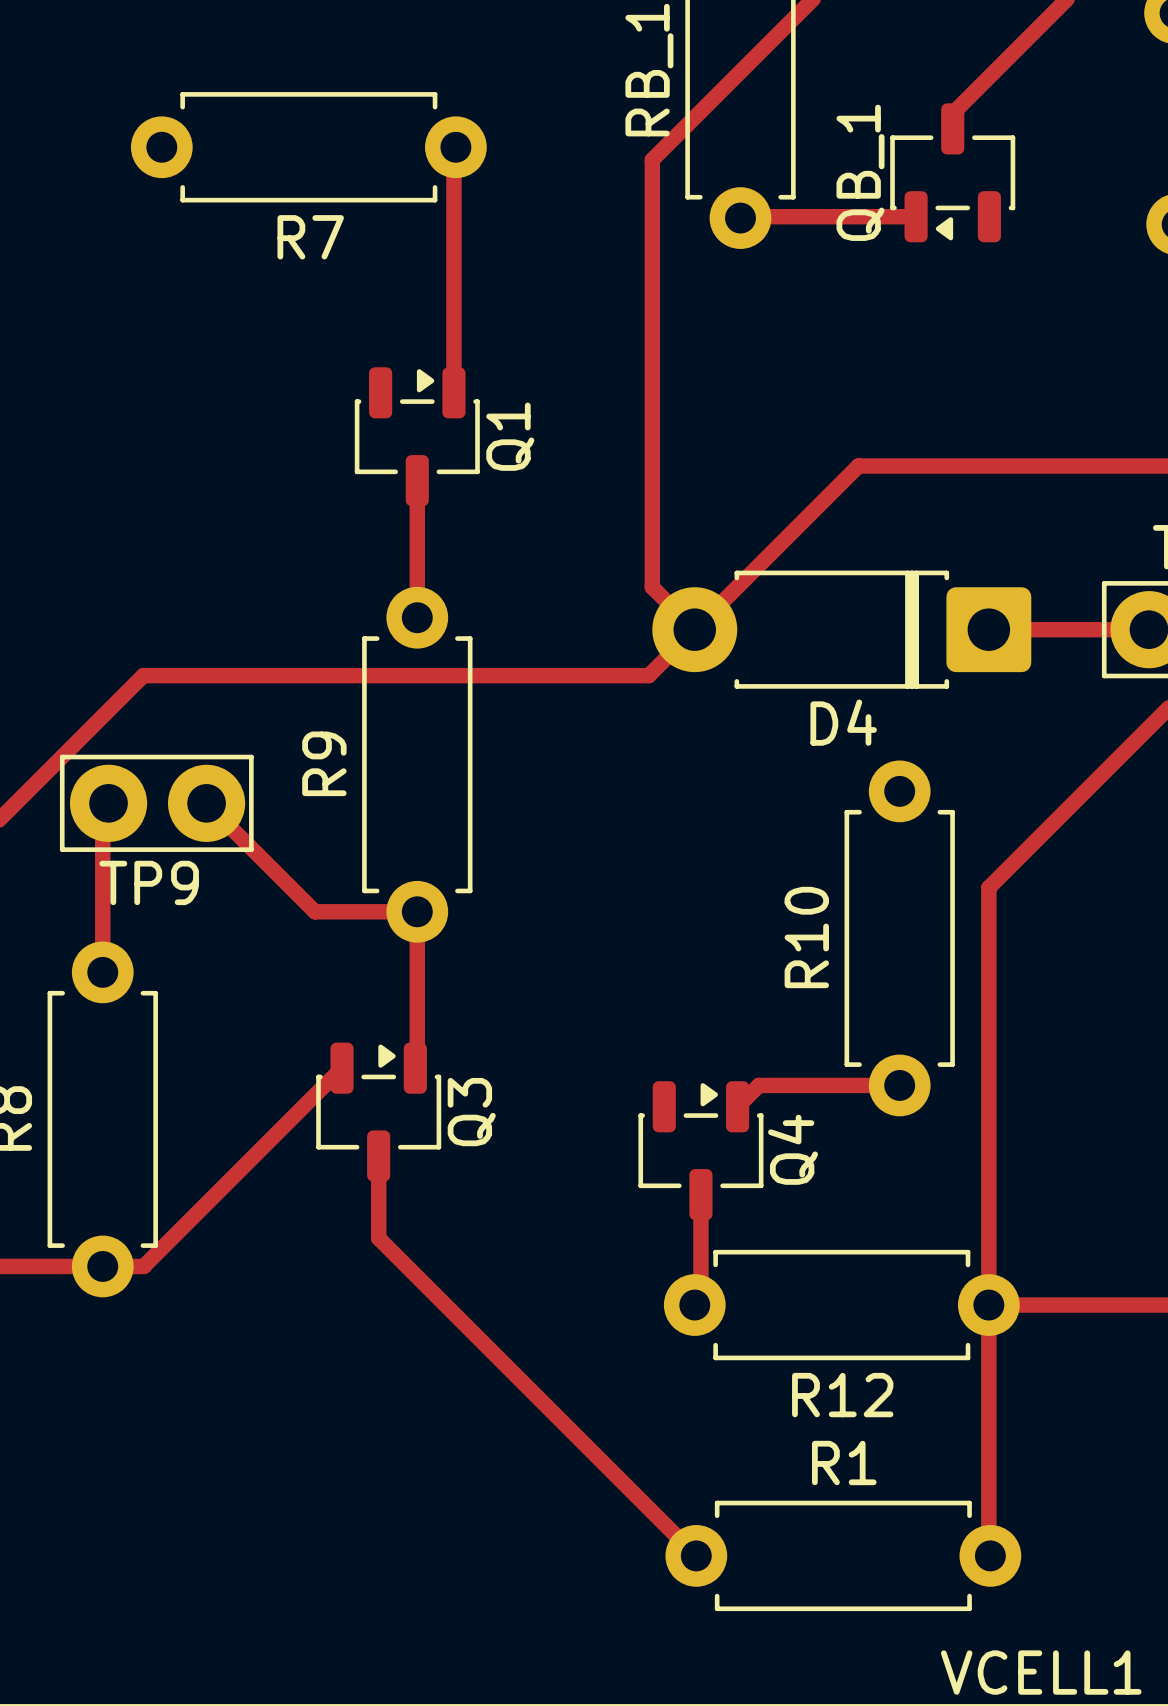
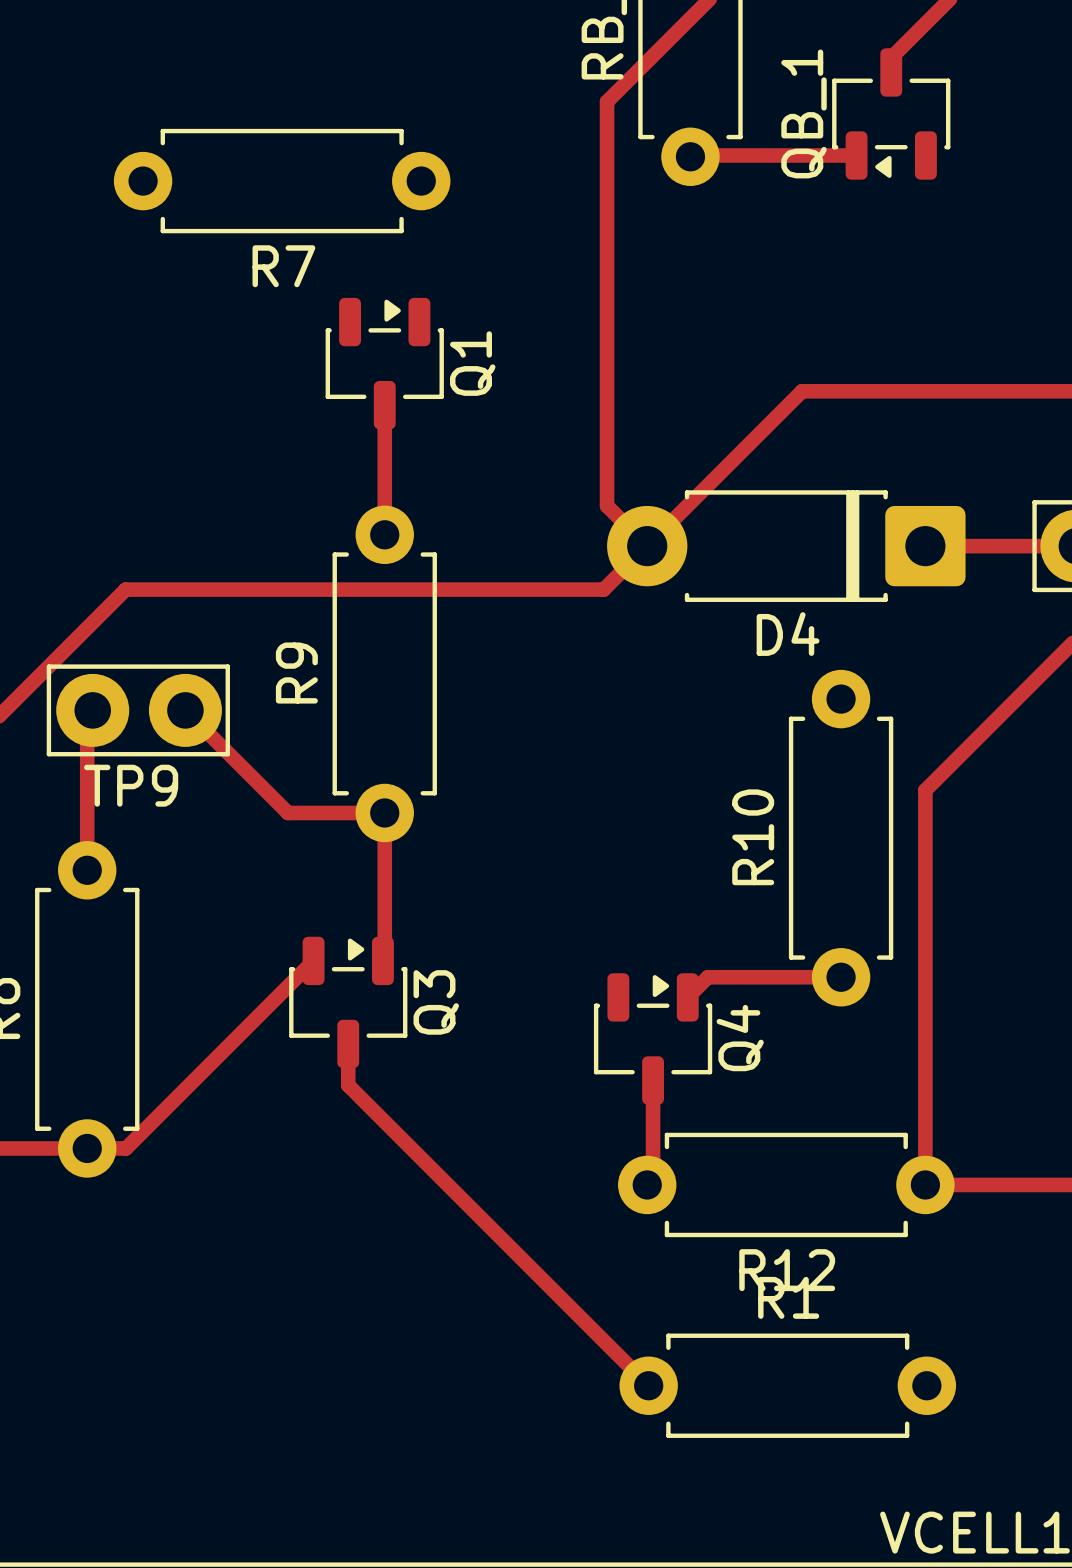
R7 position: (308, 147) -> (282, 181)
track: (455, 147) (453, 149) (453, 392) -> none
track: (378, 1199) (378, 1238) (696, 1555) -> (348, 1085) (648, 1385)
track: (988, 1305) (988, 1554) (990, 1555) -> none
R1 position: (843, 1555) -> (787, 1385)

